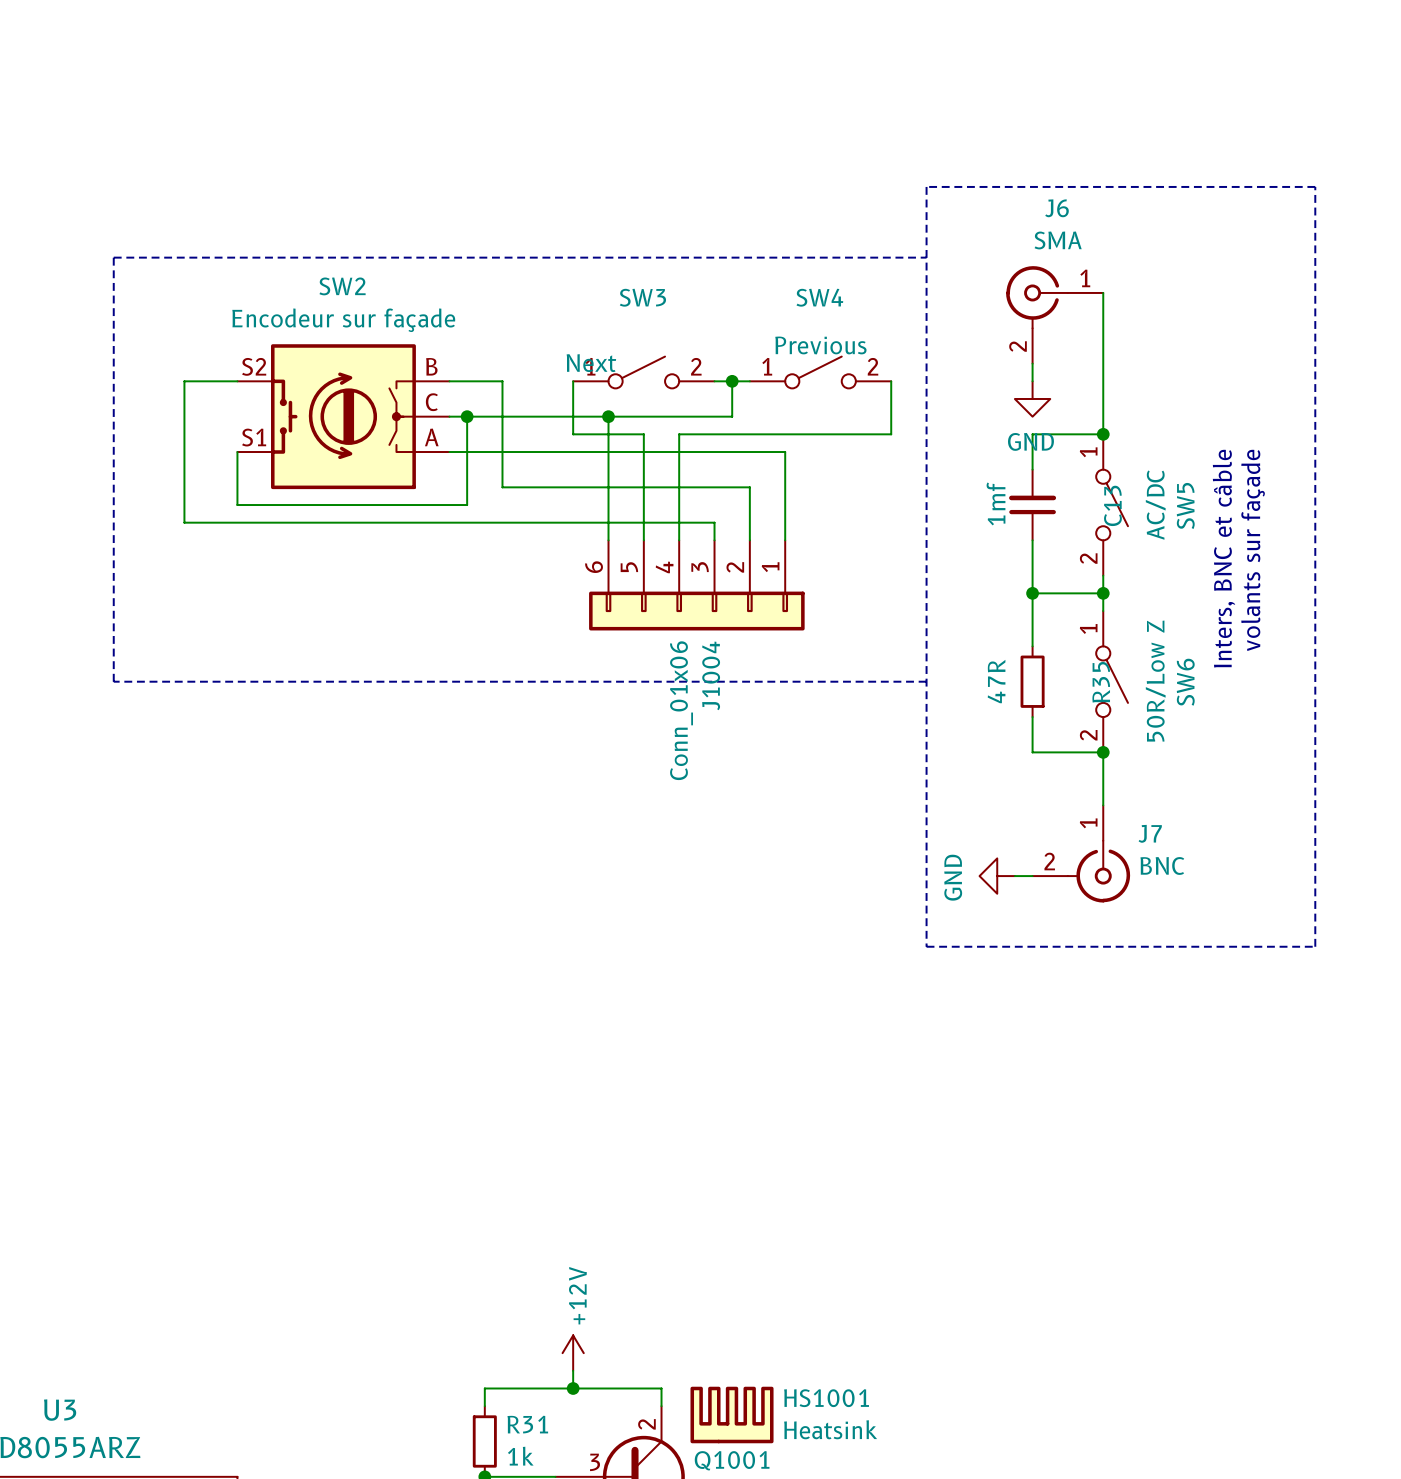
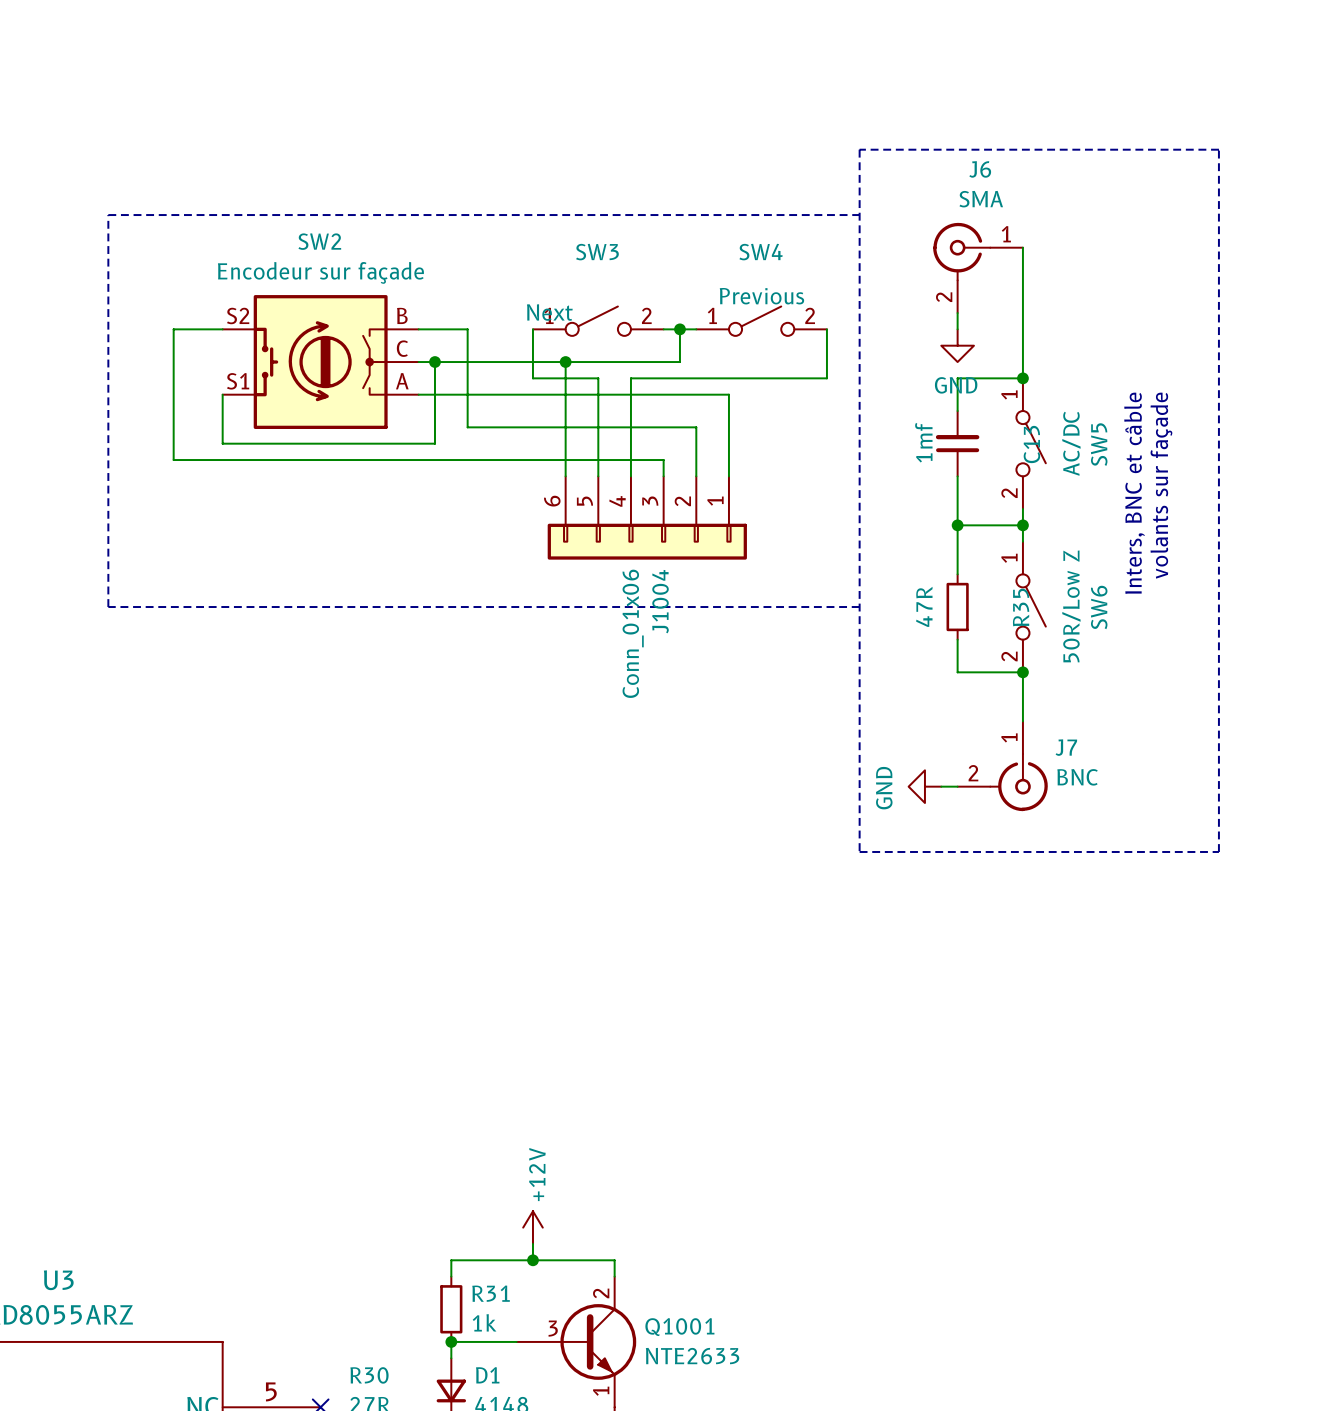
HS1001: Heatsink (732, 1414) -> none

